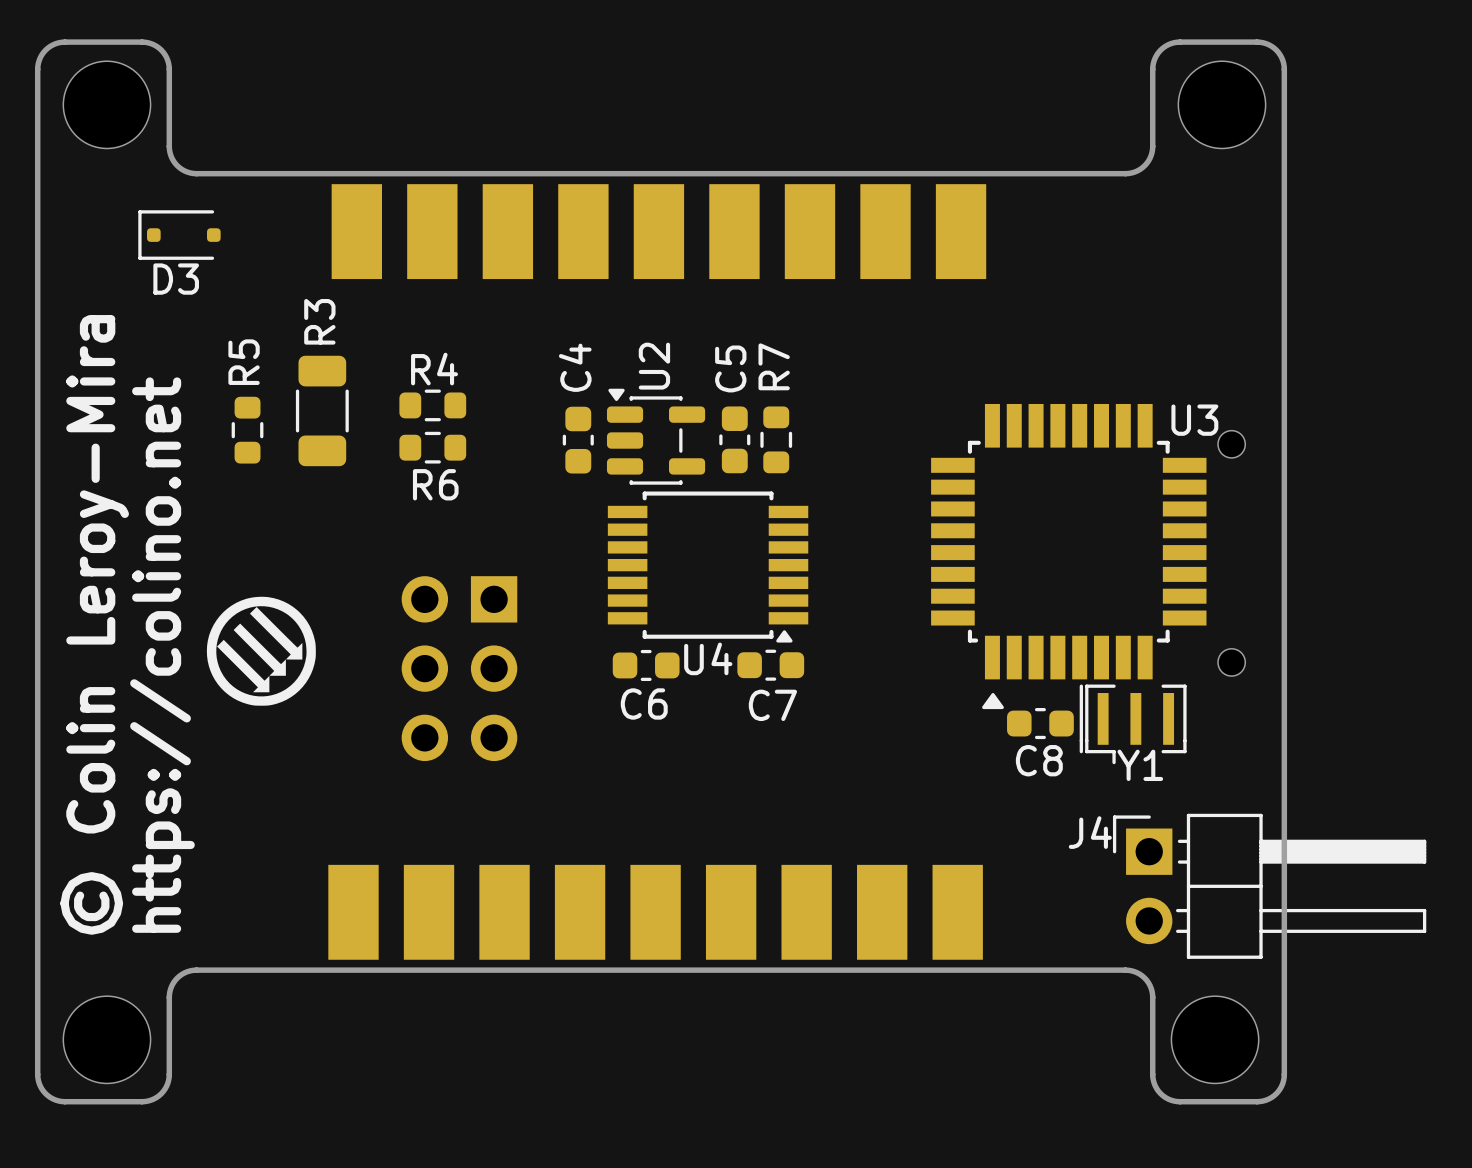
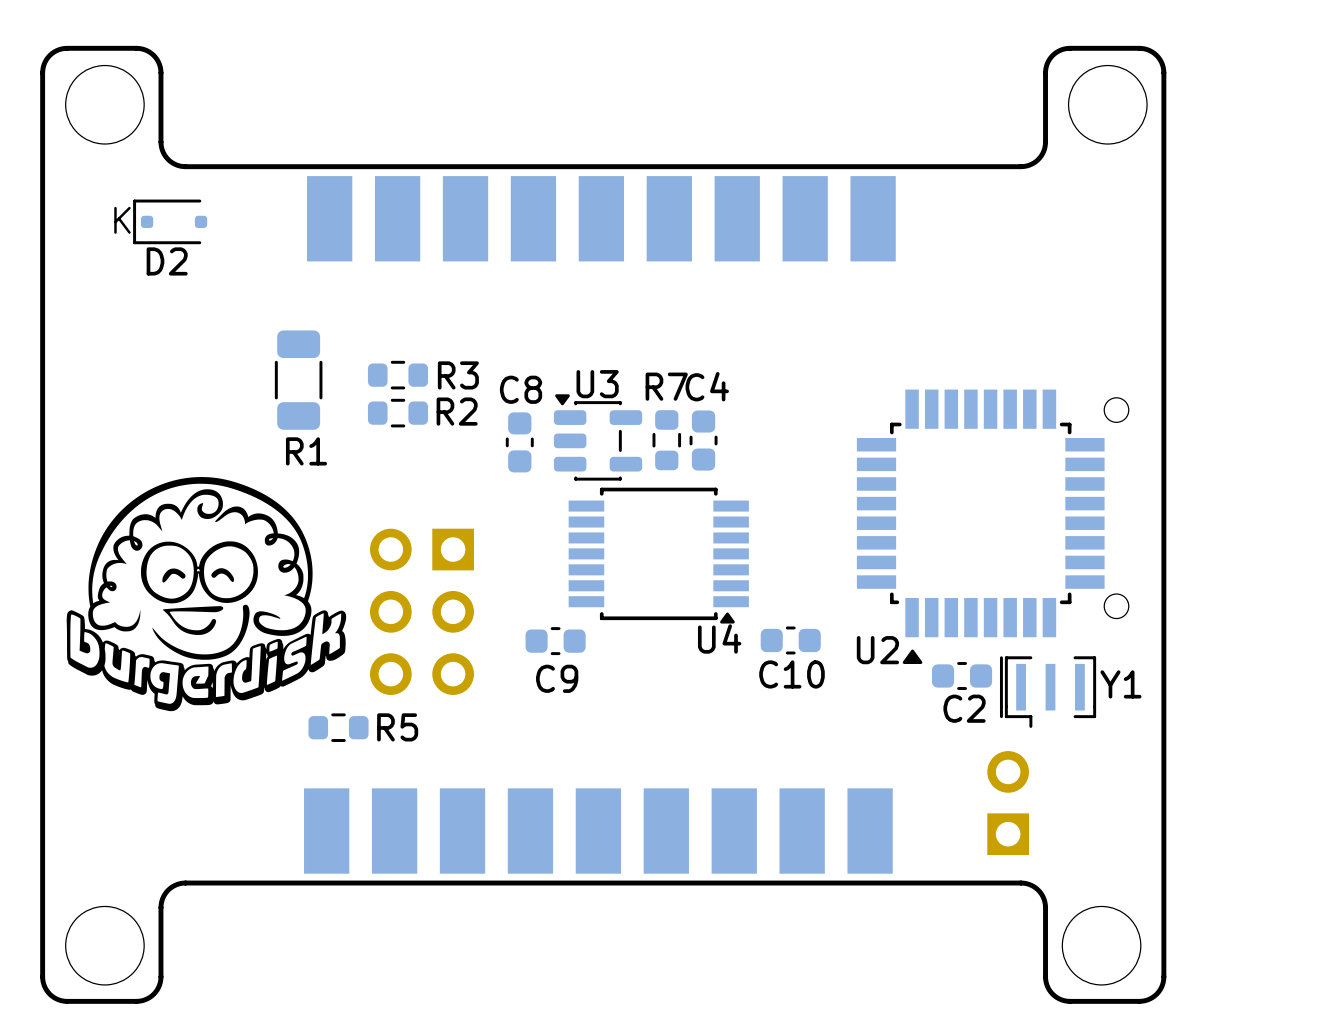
D3 text: none -> K (122, 220)
D3 name: D3 (176, 279) -> D2 (167, 261)
R3 name: R3 (319, 321) -> R1 (306, 451)
U2 name position: U2 (654, 366) -> U2 (877, 650)
R7 name rotation: 0° (774, 366) -> 90° clockwise (666, 386)
C4 name rotation: 0° (575, 367) -> 90° clockwise (707, 386)
R4 name: R4 (434, 369) -> R3 (458, 375)
U2 footprint: [606, 388, 706, 485] -> [856, 389, 1105, 664]
U3 footprint: [931, 403, 1207, 710] -> [553, 394, 643, 481]
U3 name position: U3 (1194, 420) -> U3 (597, 384)
R5 rotation: 0° (247, 430) -> 90° clockwise (338, 727)
R5 position: (247, 430) -> (338, 727)
C5: (734, 439) -> none
R7 position: (776, 439) -> (666, 440)
C4 position: (578, 440) -> (703, 440)
R6 name: R6 (435, 484) -> R2 (457, 411)
drawing: none -> [66, 477, 347, 712]
U4 position: (708, 567) -> (658, 555)
drawing: [206, 596, 316, 706] -> none
text: © Colin Leroy-Mira (94, 624) -> none
text: https://colino.net (162, 655) -> none
U4 name position: U4 (708, 658) -> U4 (719, 638)
C6: (646, 665) -> none
C7: (770, 665) -> none
C10: none -> (790, 640)
C9: none -> (555, 641)
C8 rotation: 0° (1040, 723) -> 90° clockwise (519, 442)
C8 position: (1040, 723) -> (519, 442)
Y1 position: (1133, 724) -> (1048, 692)
C2: none -> (962, 675)
C8 name position: C8 (1039, 760) -> C8 (521, 389)
Y1 name position: Y1 (1140, 765) -> Y1 (1120, 684)
J4 side: bottom (1269, 886) -> top (1008, 803)

